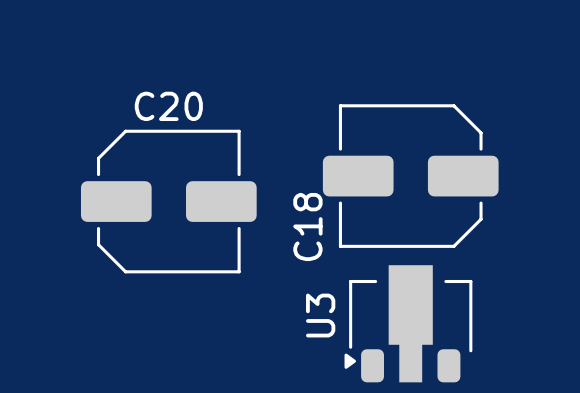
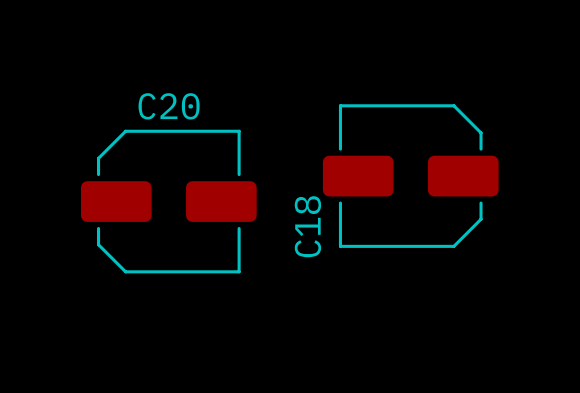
U3: (408, 323) -> none

